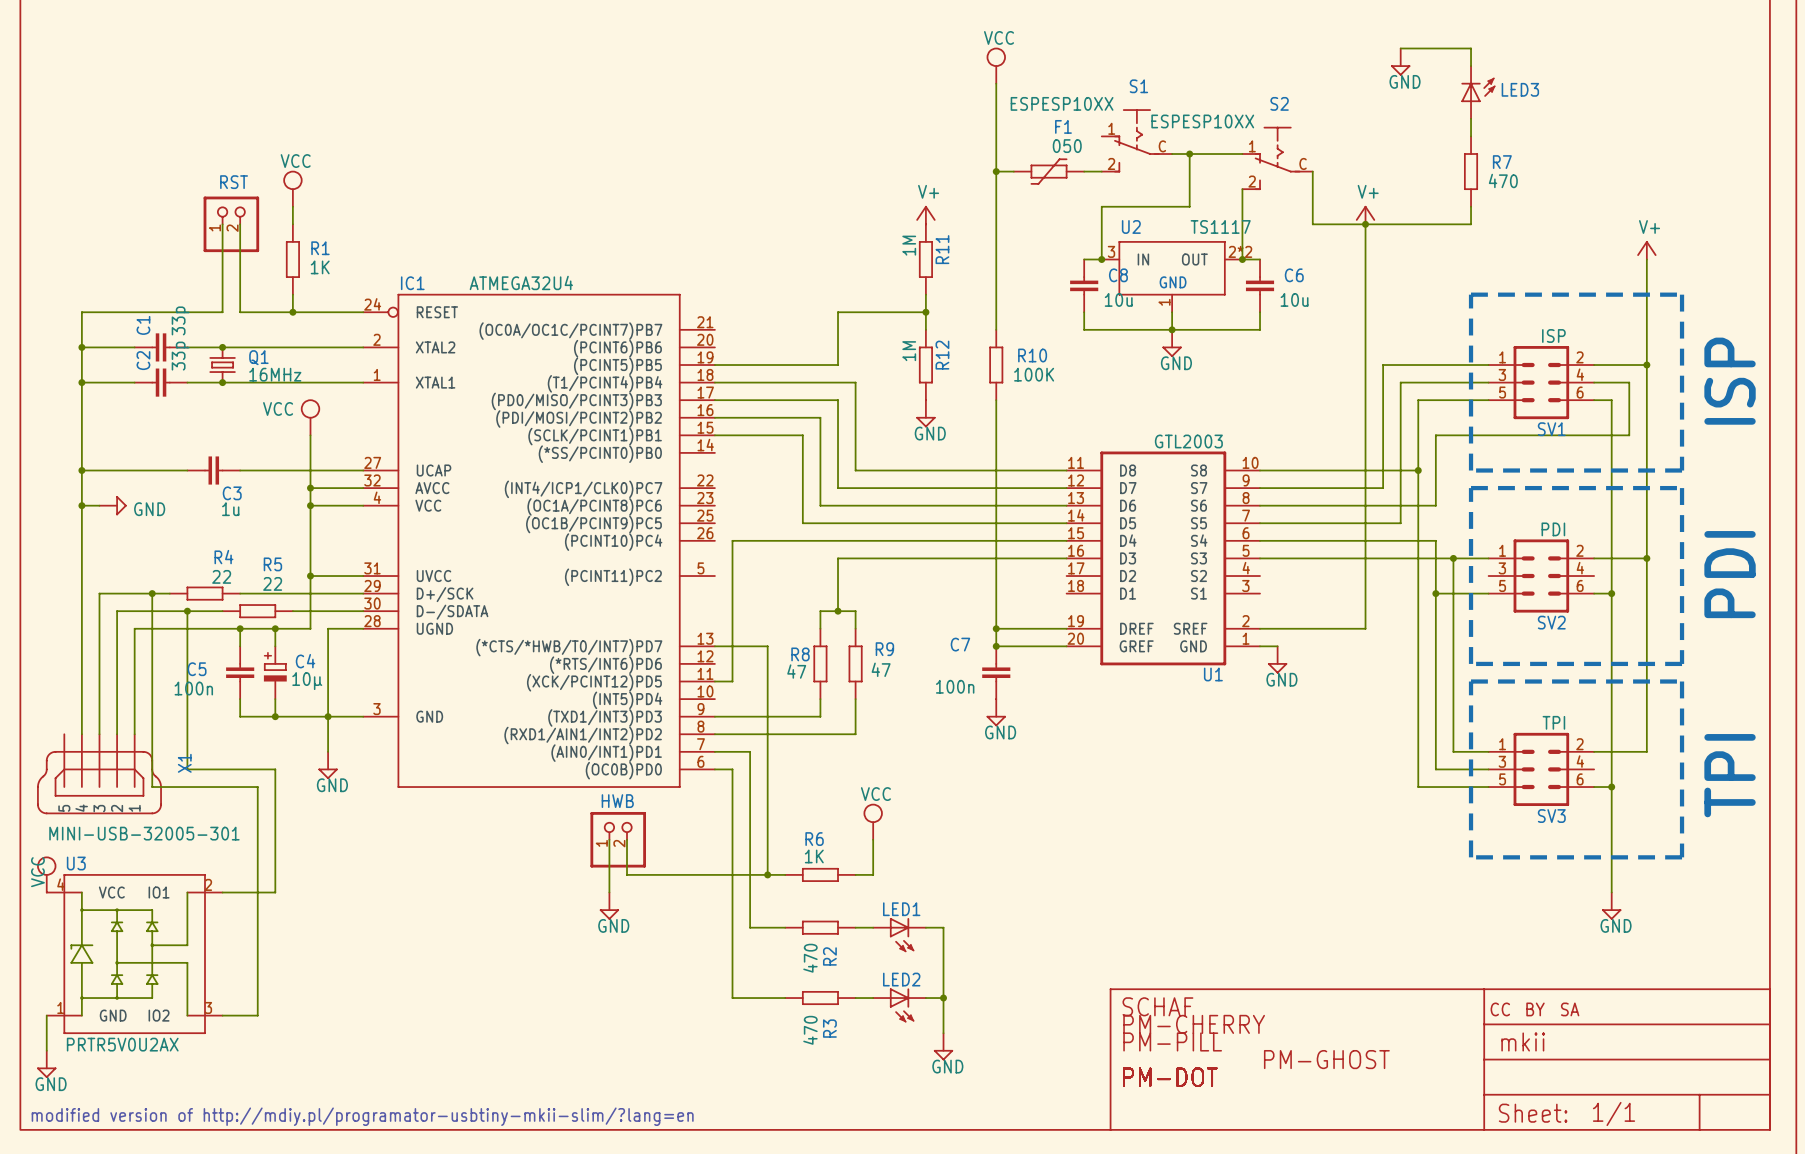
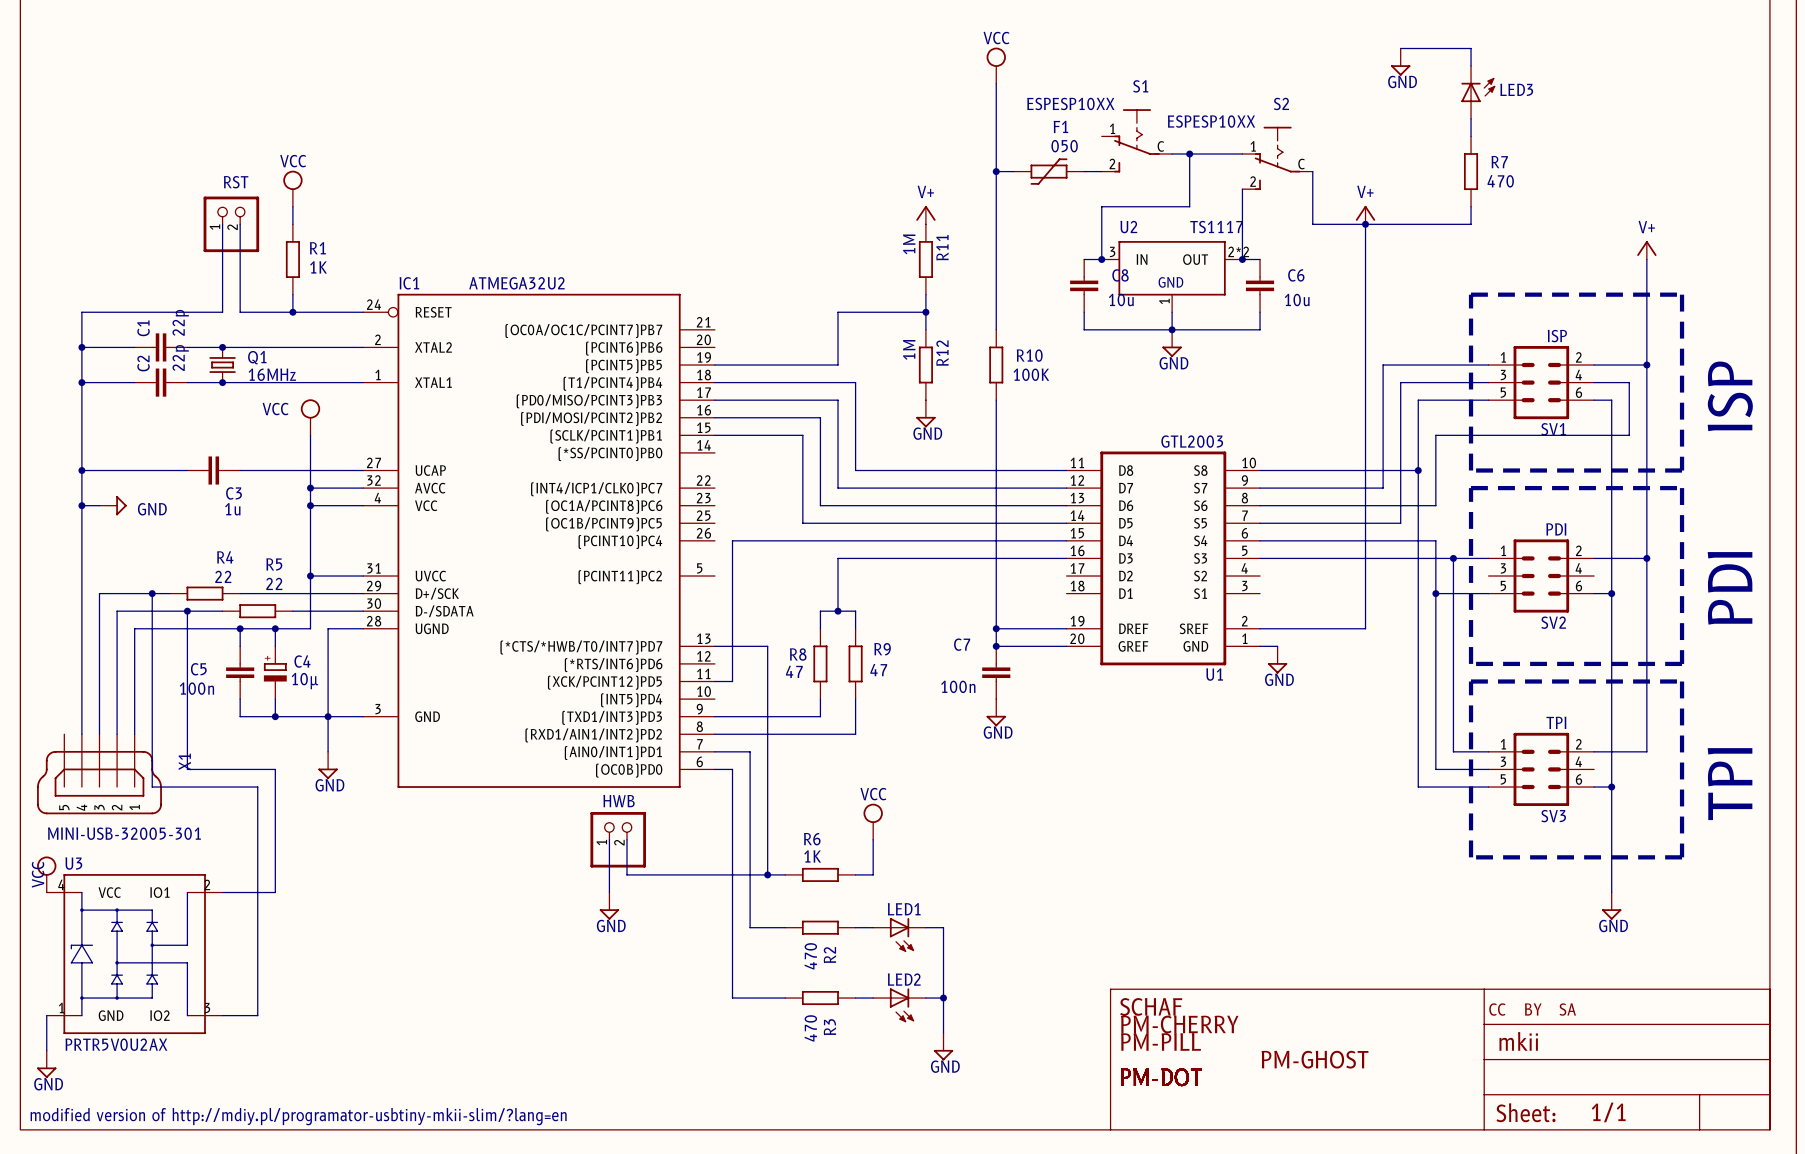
IC1 value: ATMEGA32U4 (521, 282) -> ATMEGA32U2 (516, 283)
C1 value: 33p (180, 320) -> 22p (180, 322)
C2 value: 33p (180, 356) -> 22p (180, 358)

